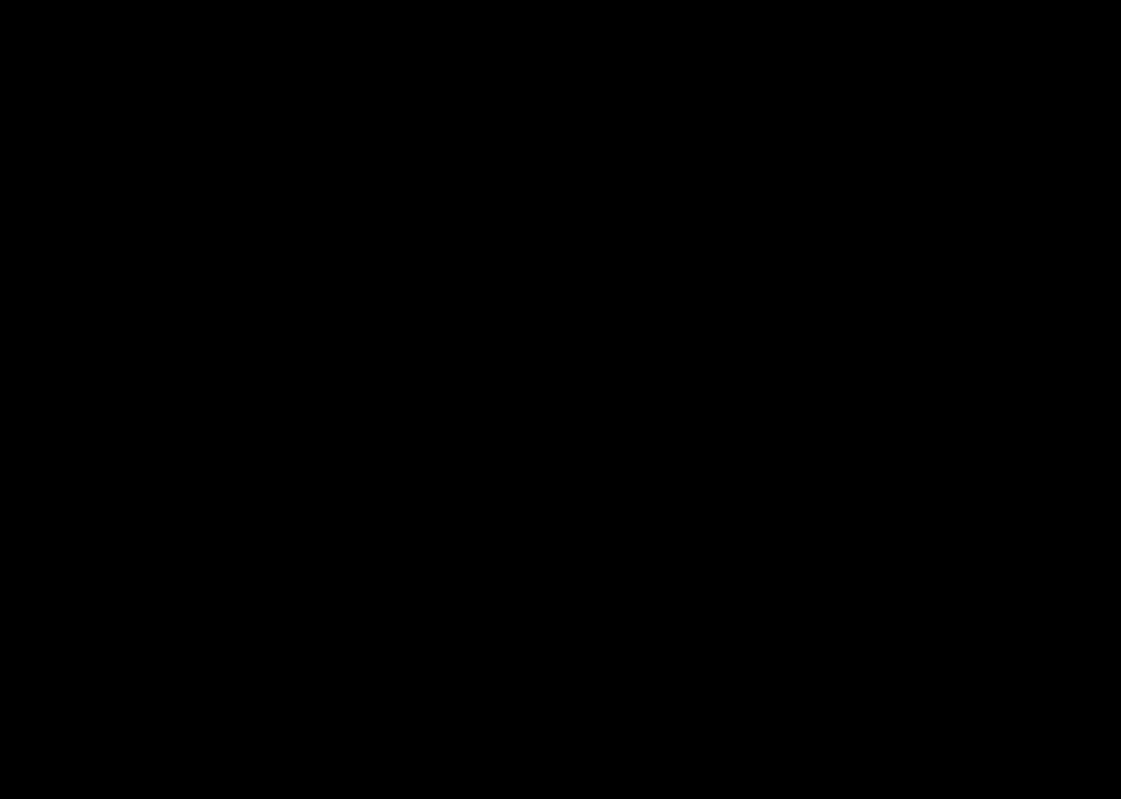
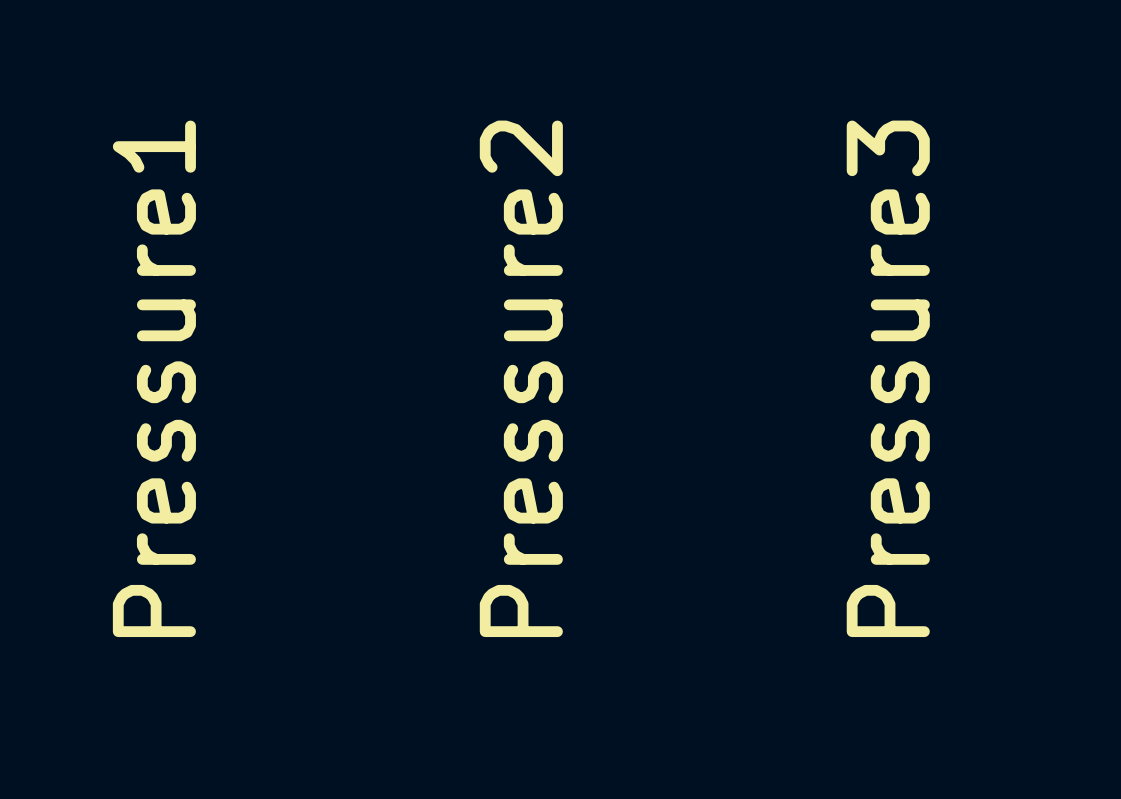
text: none -> Pressure3 (888, 378)
text: none -> Pressure1 (154, 378)
text: none -> Pressure2 (521, 378)

